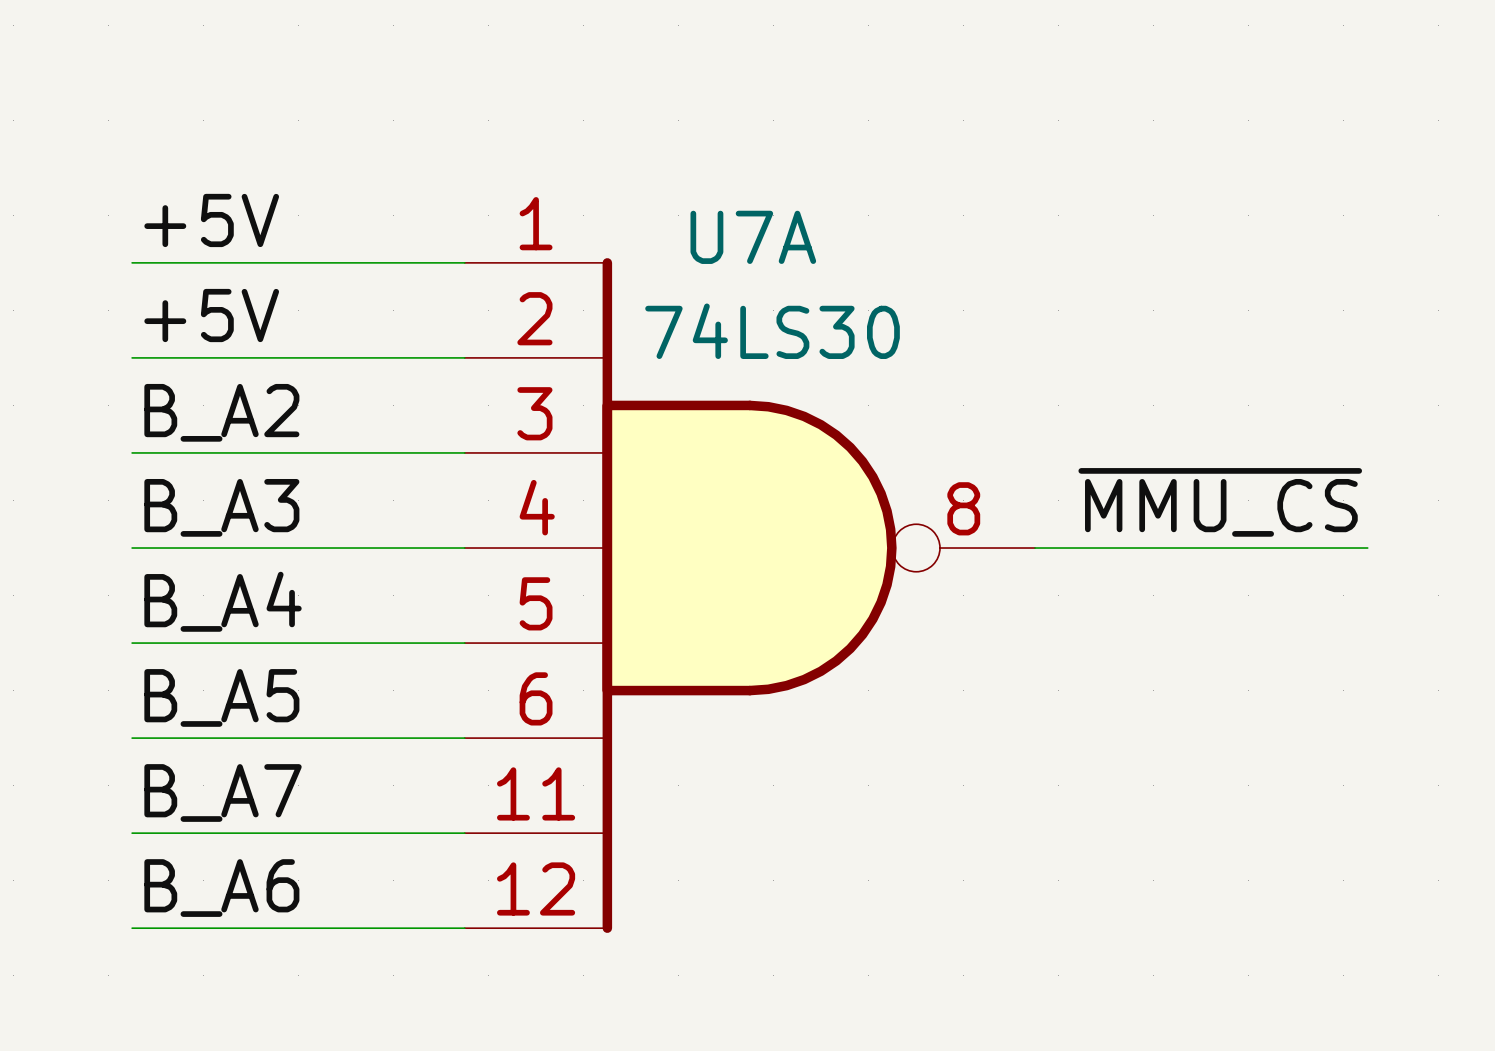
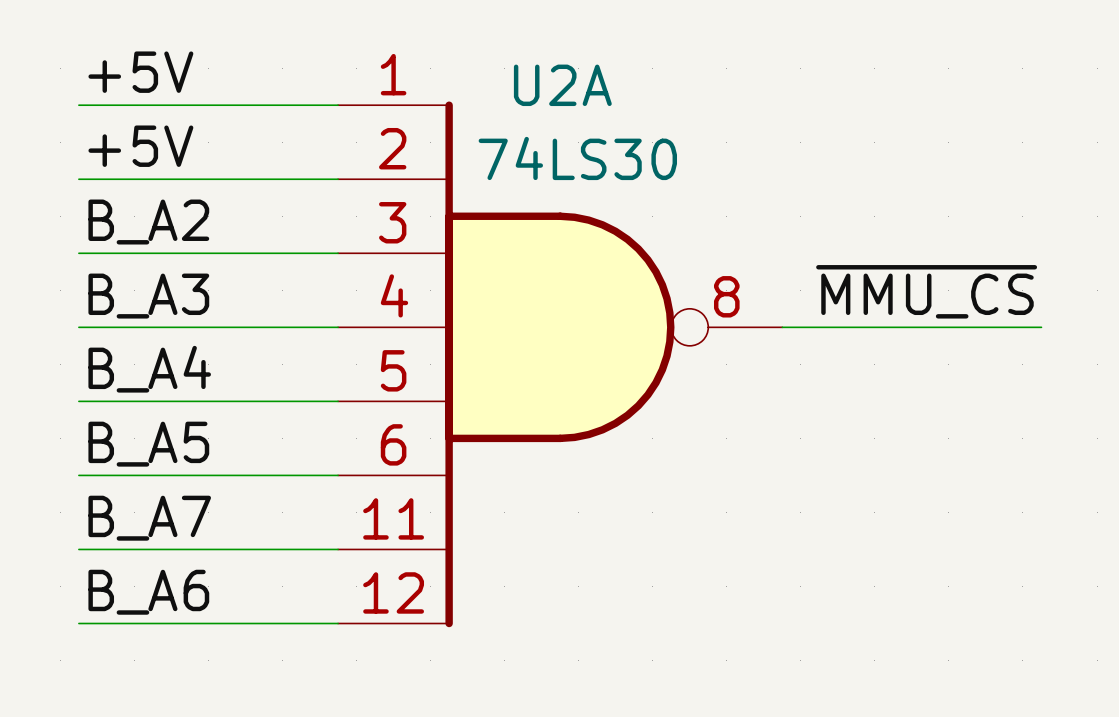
U7A name: U7A (753, 237) -> U2A (562, 85)

